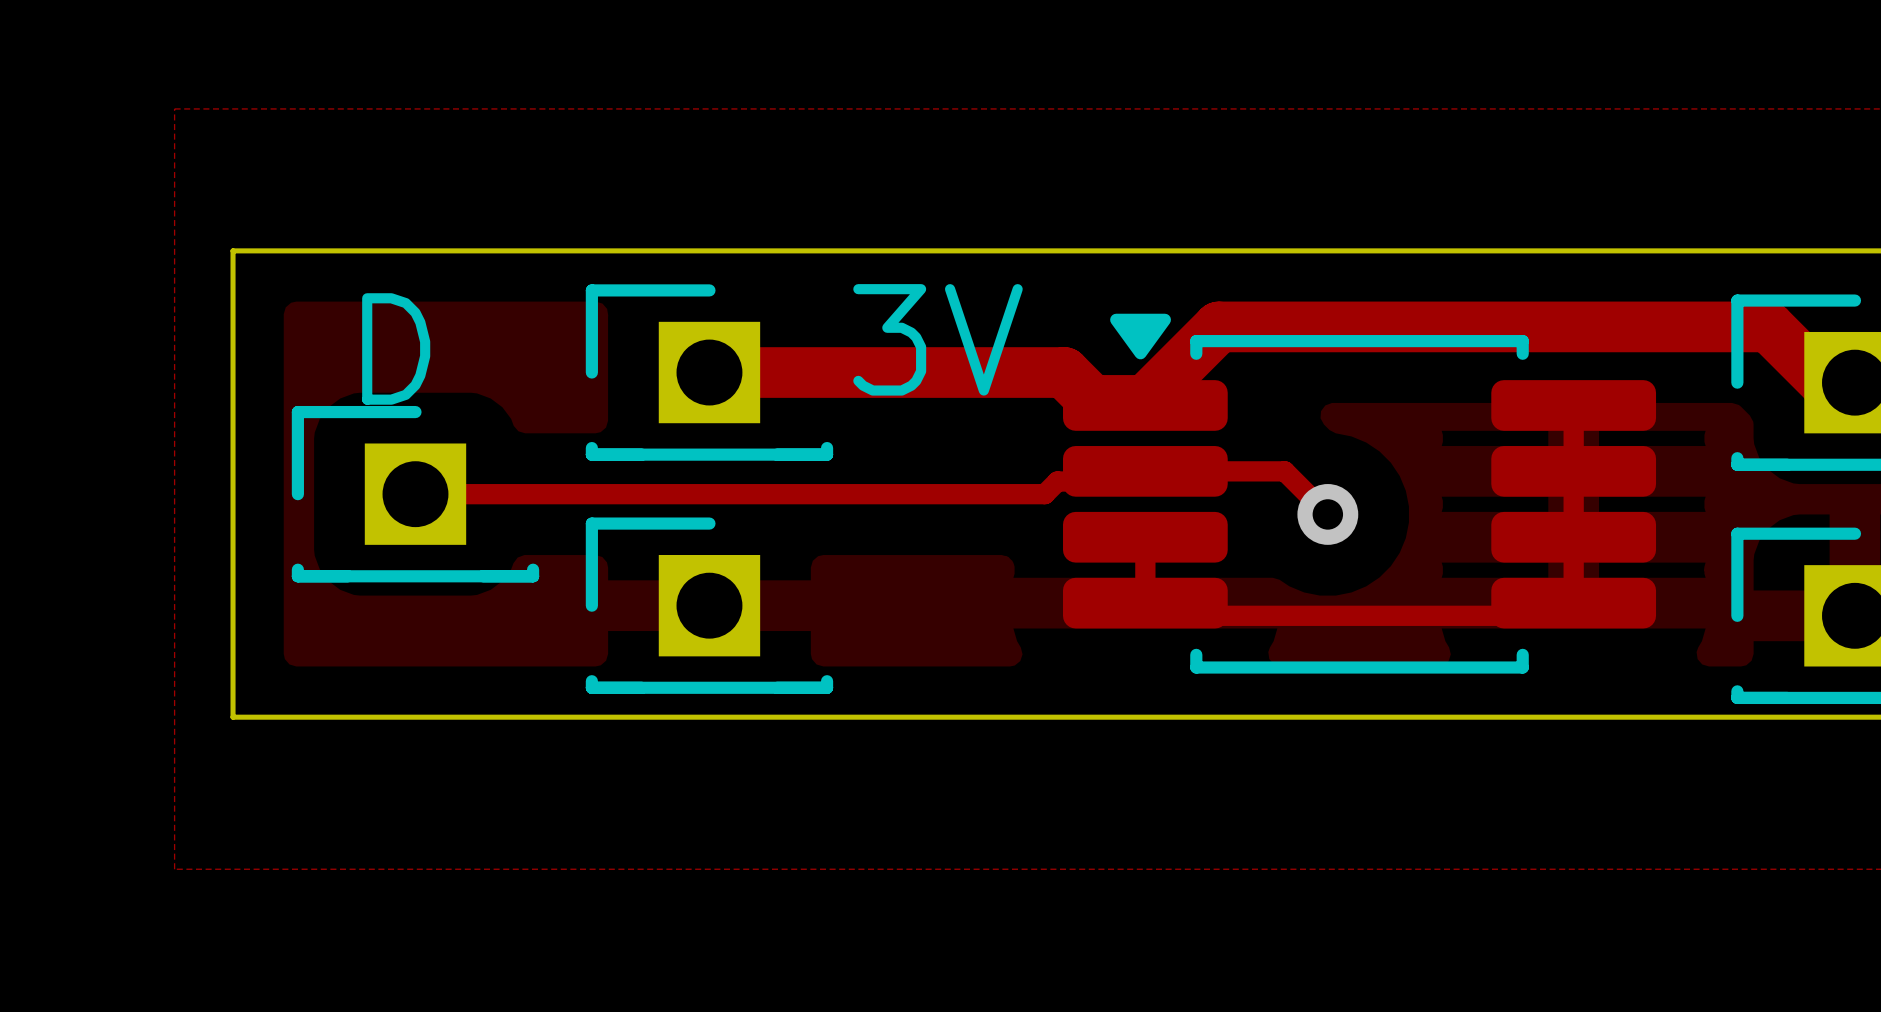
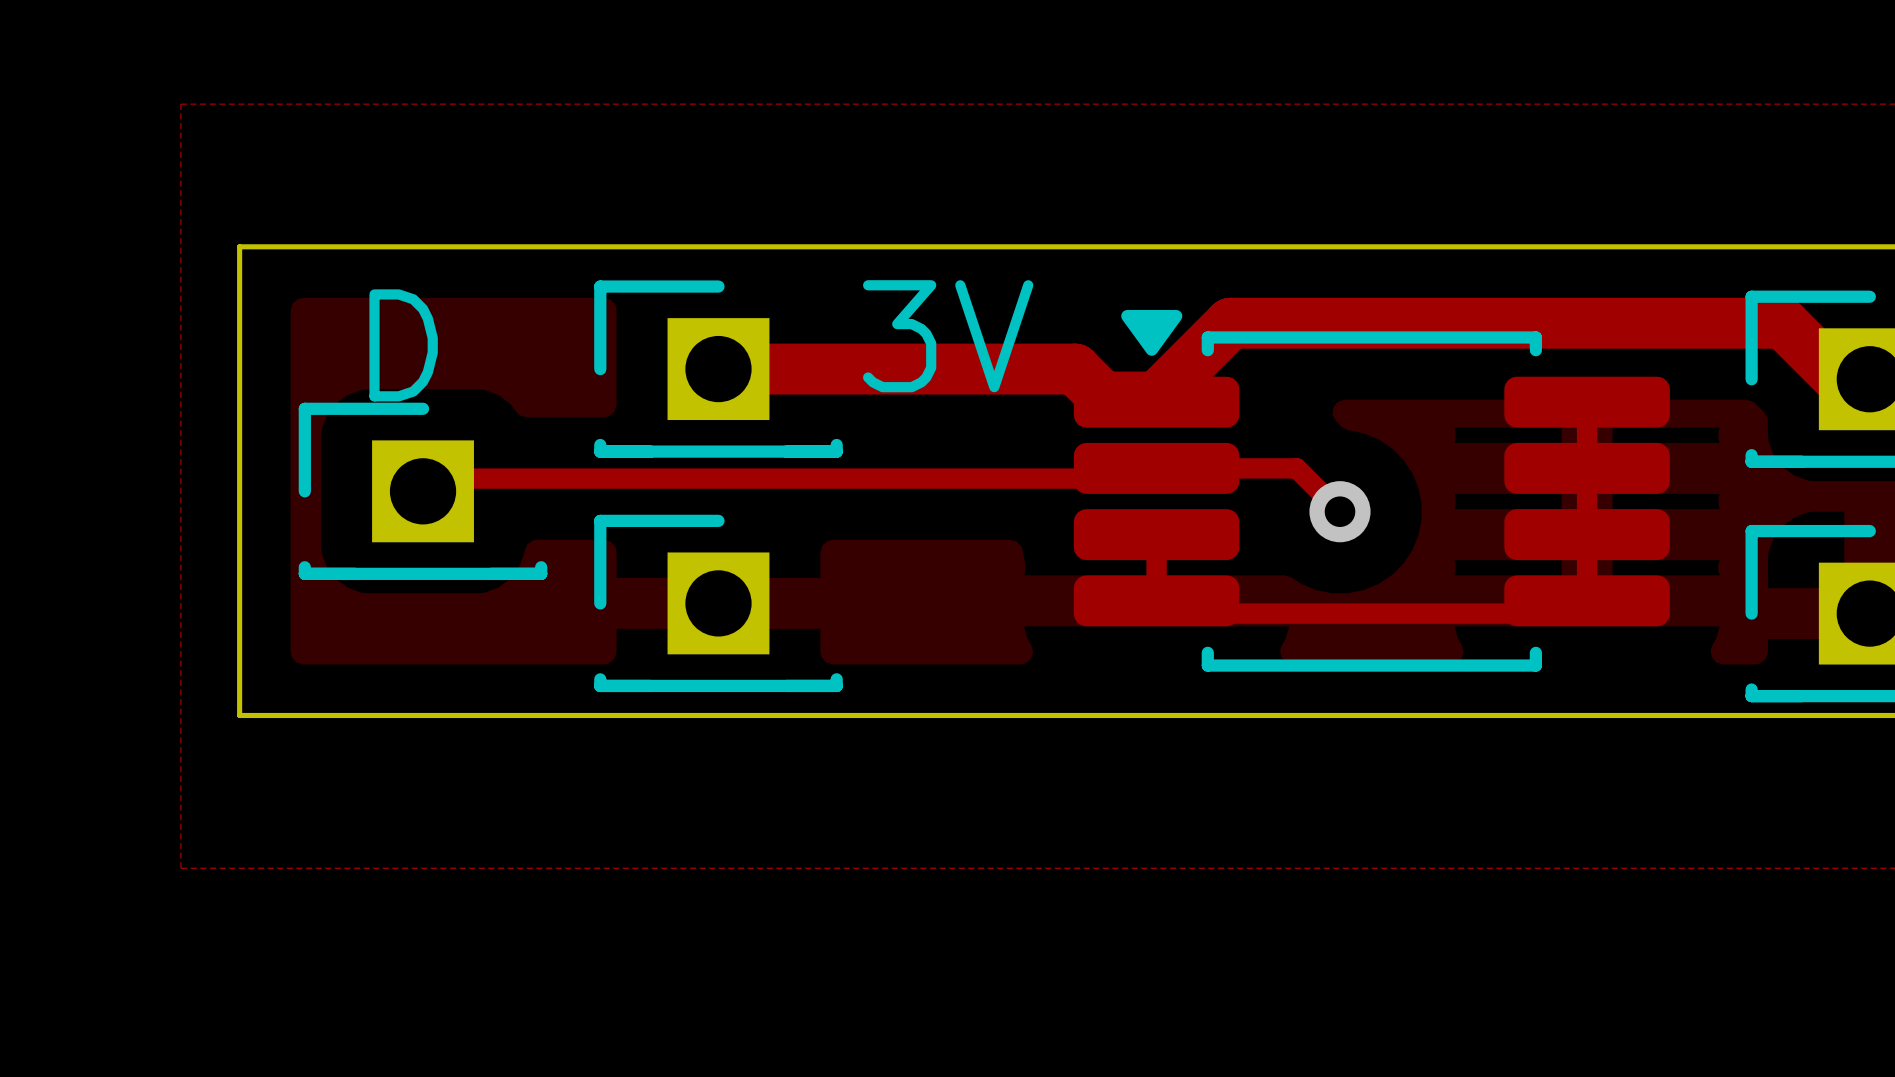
track: (1057, 481) (1044, 494) (385, 494) -> (1068, 478) (405, 478) (392, 491)

